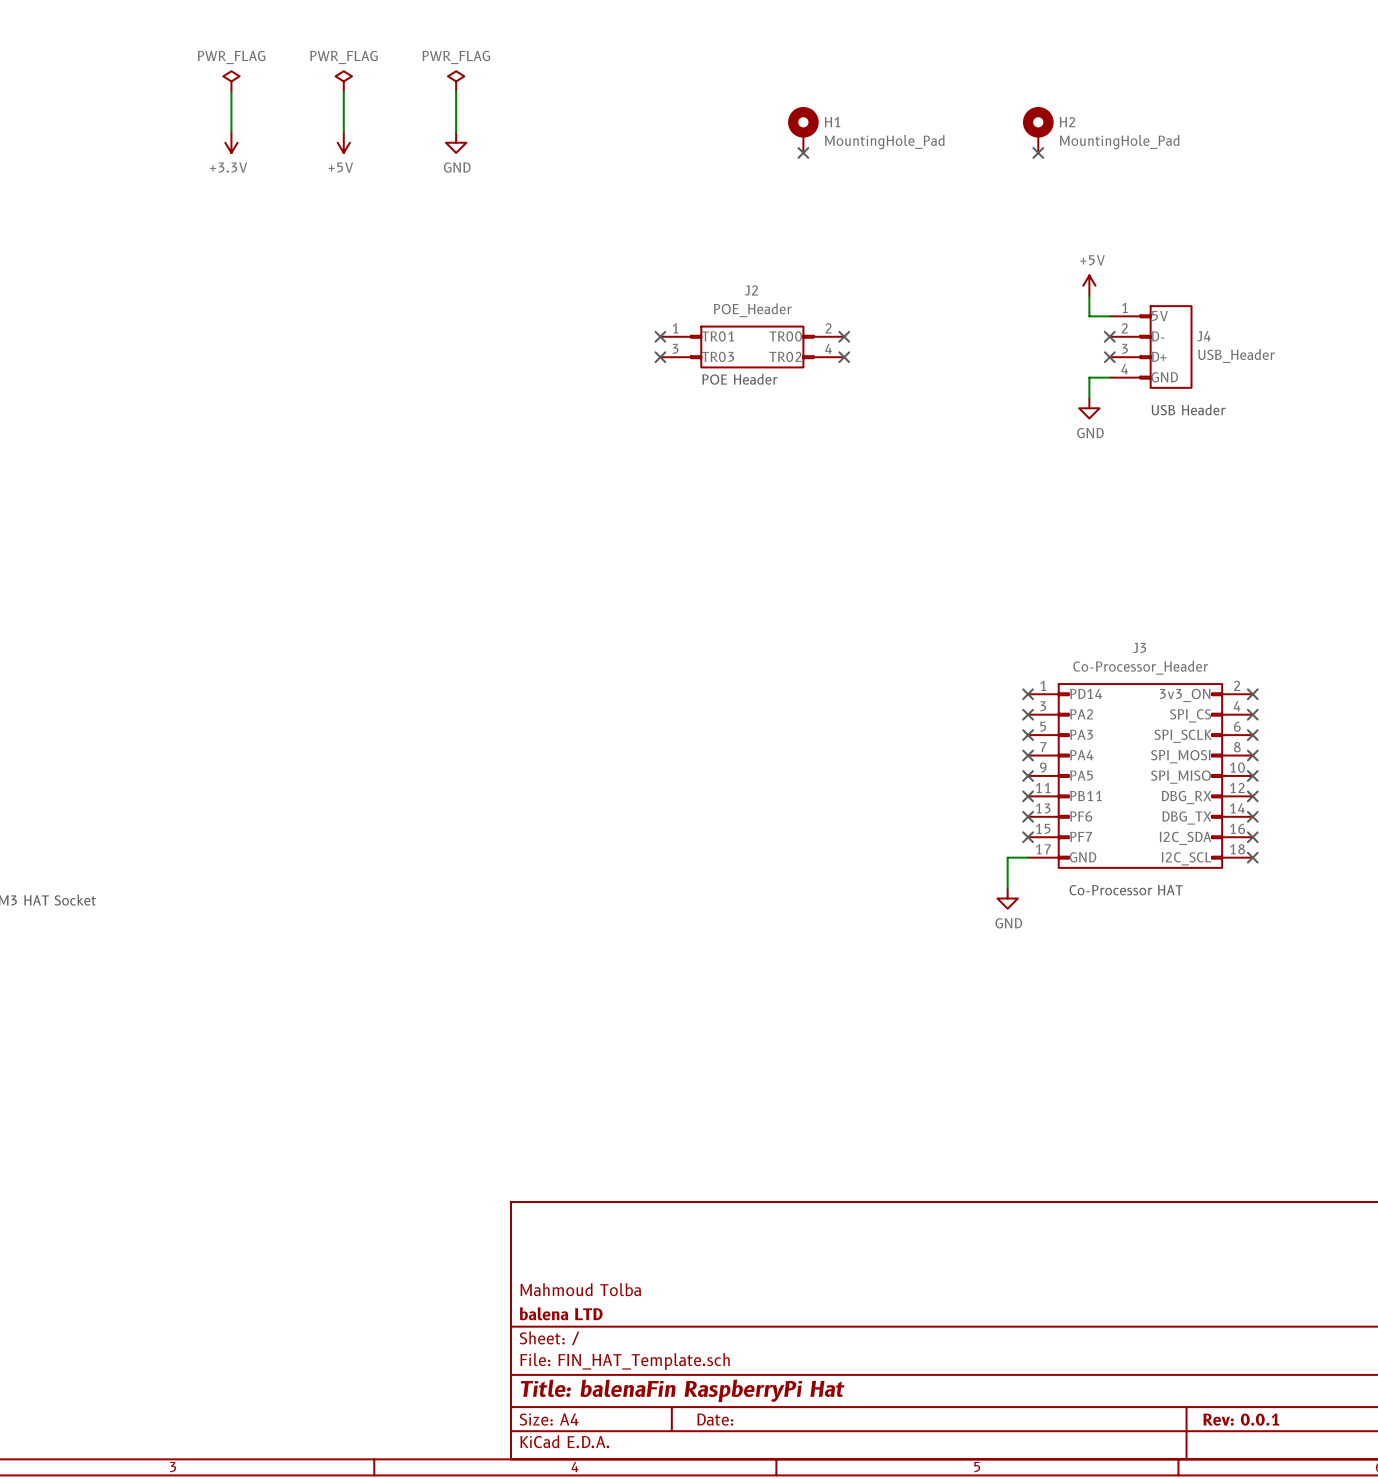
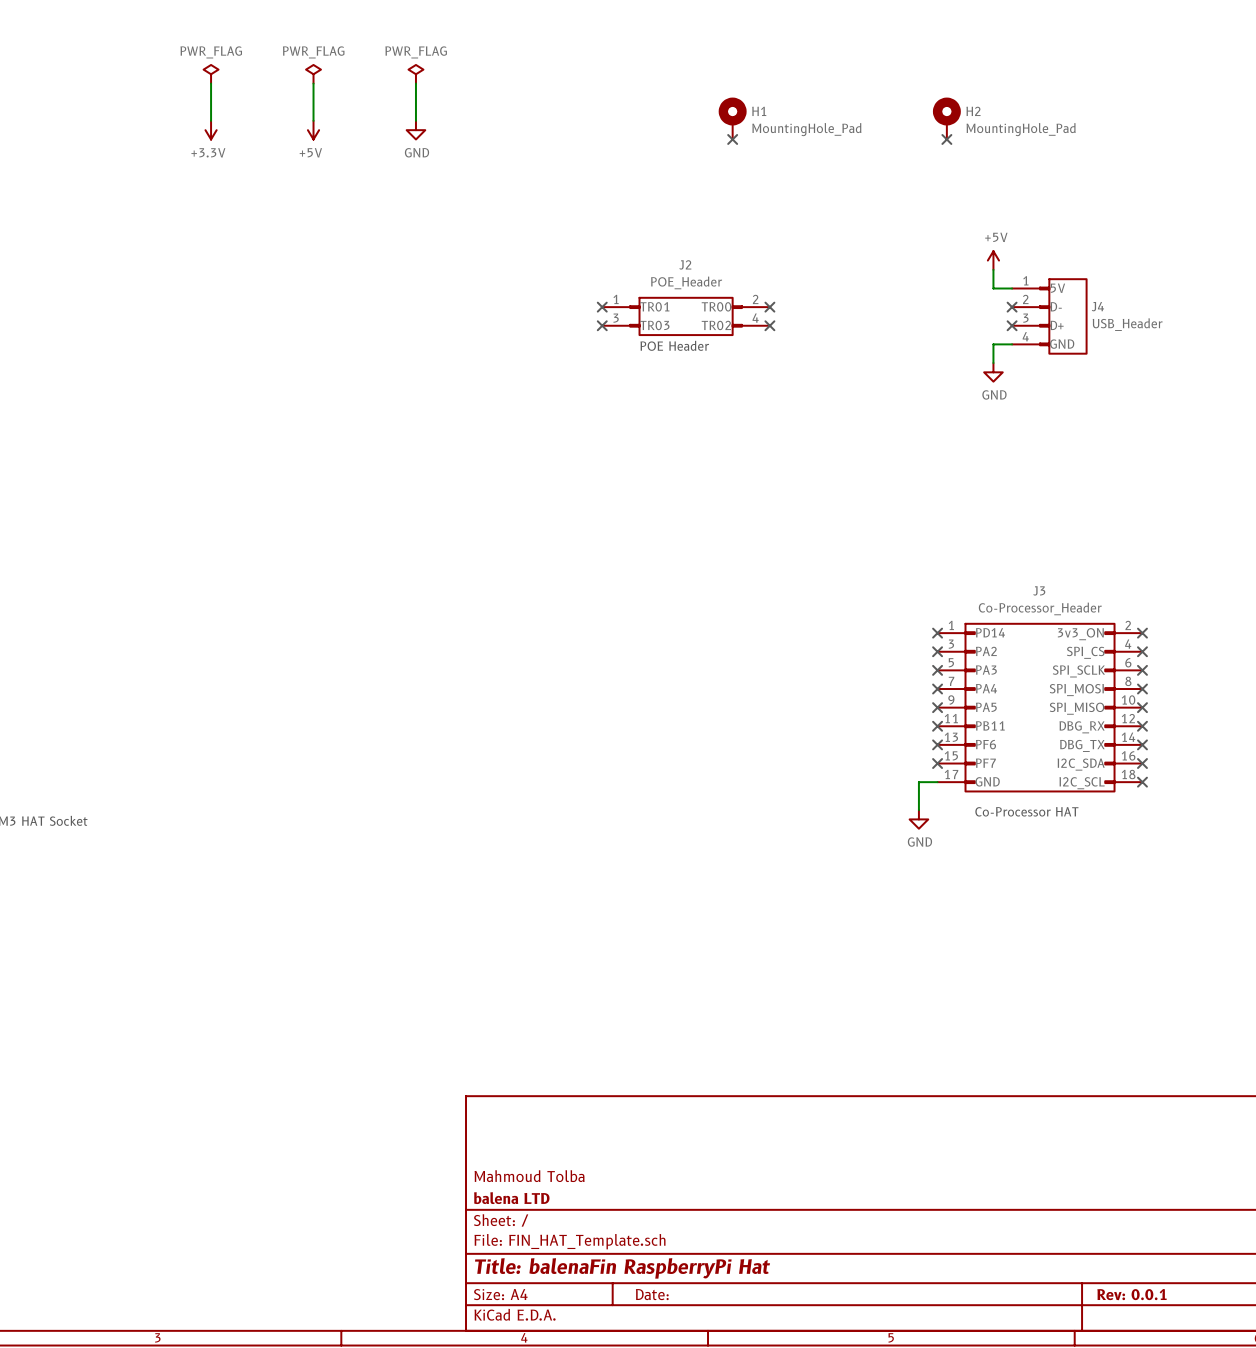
text: USB Header (1188, 409) -> none

